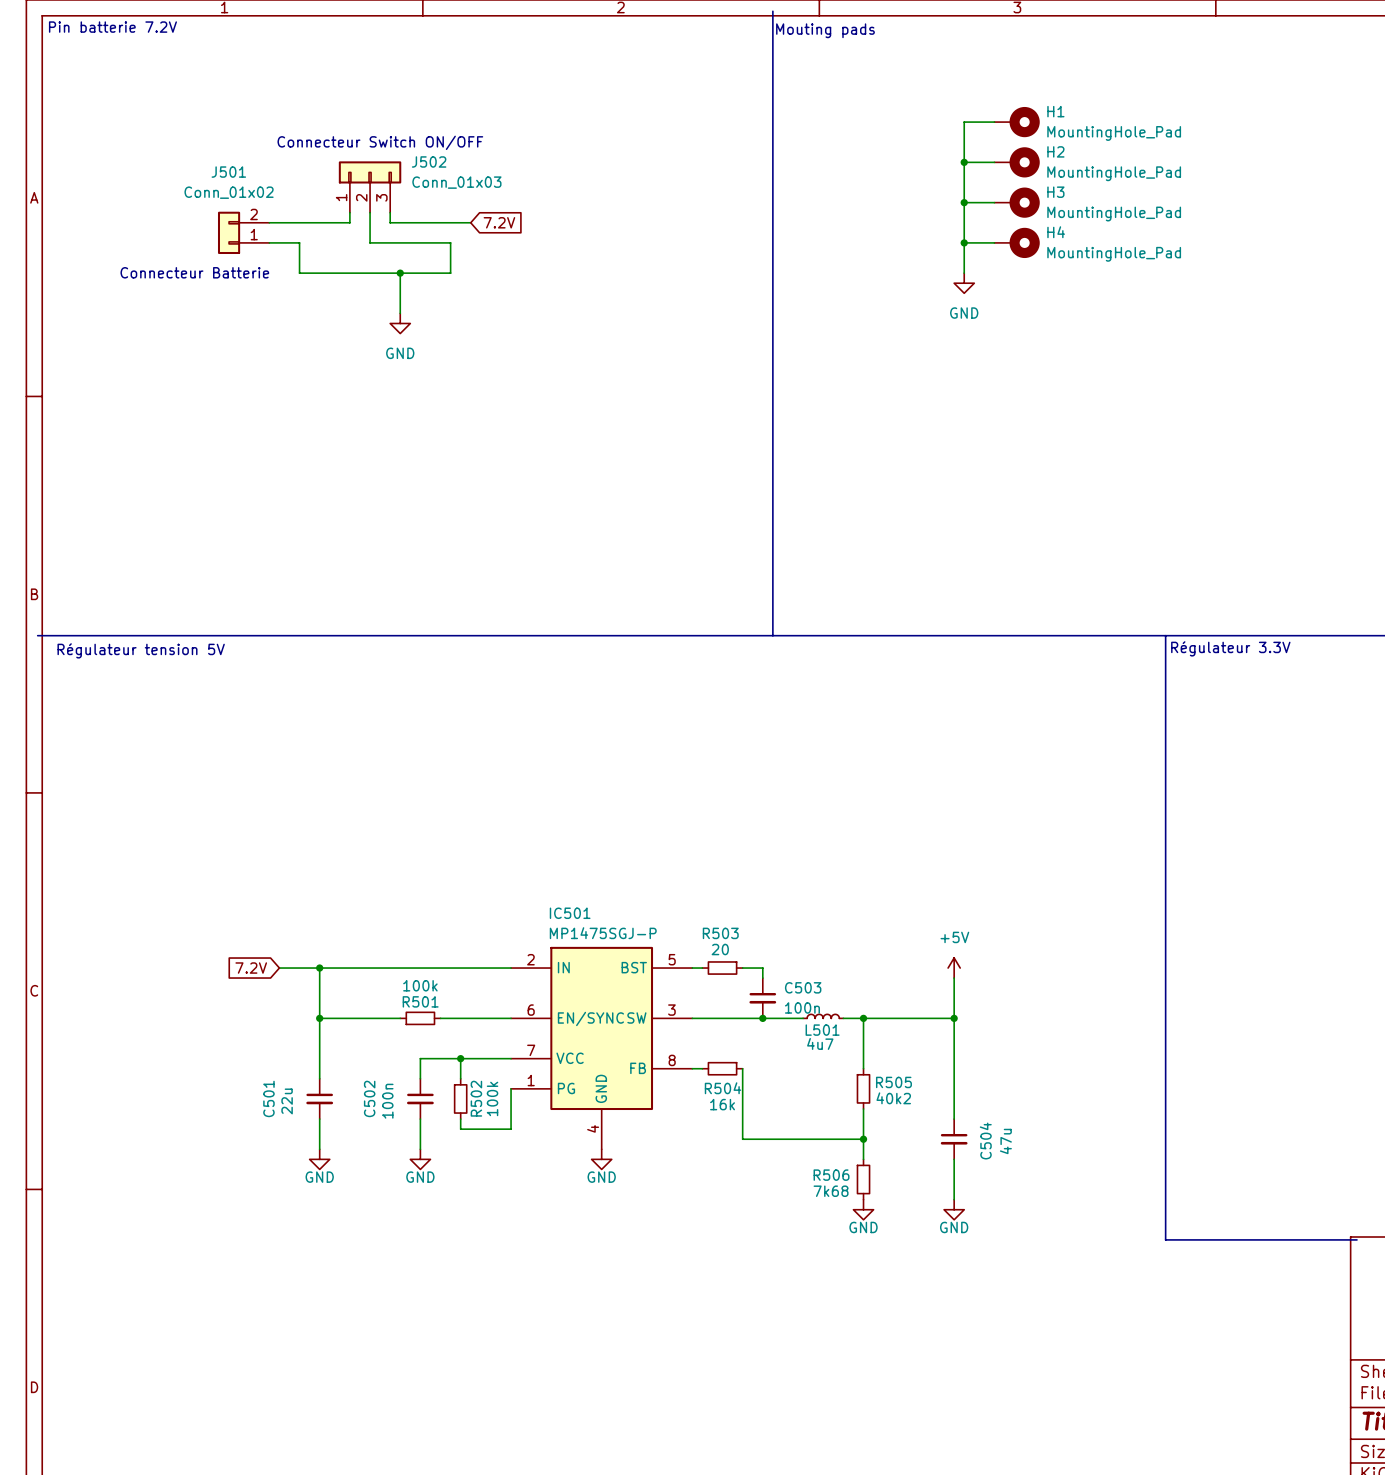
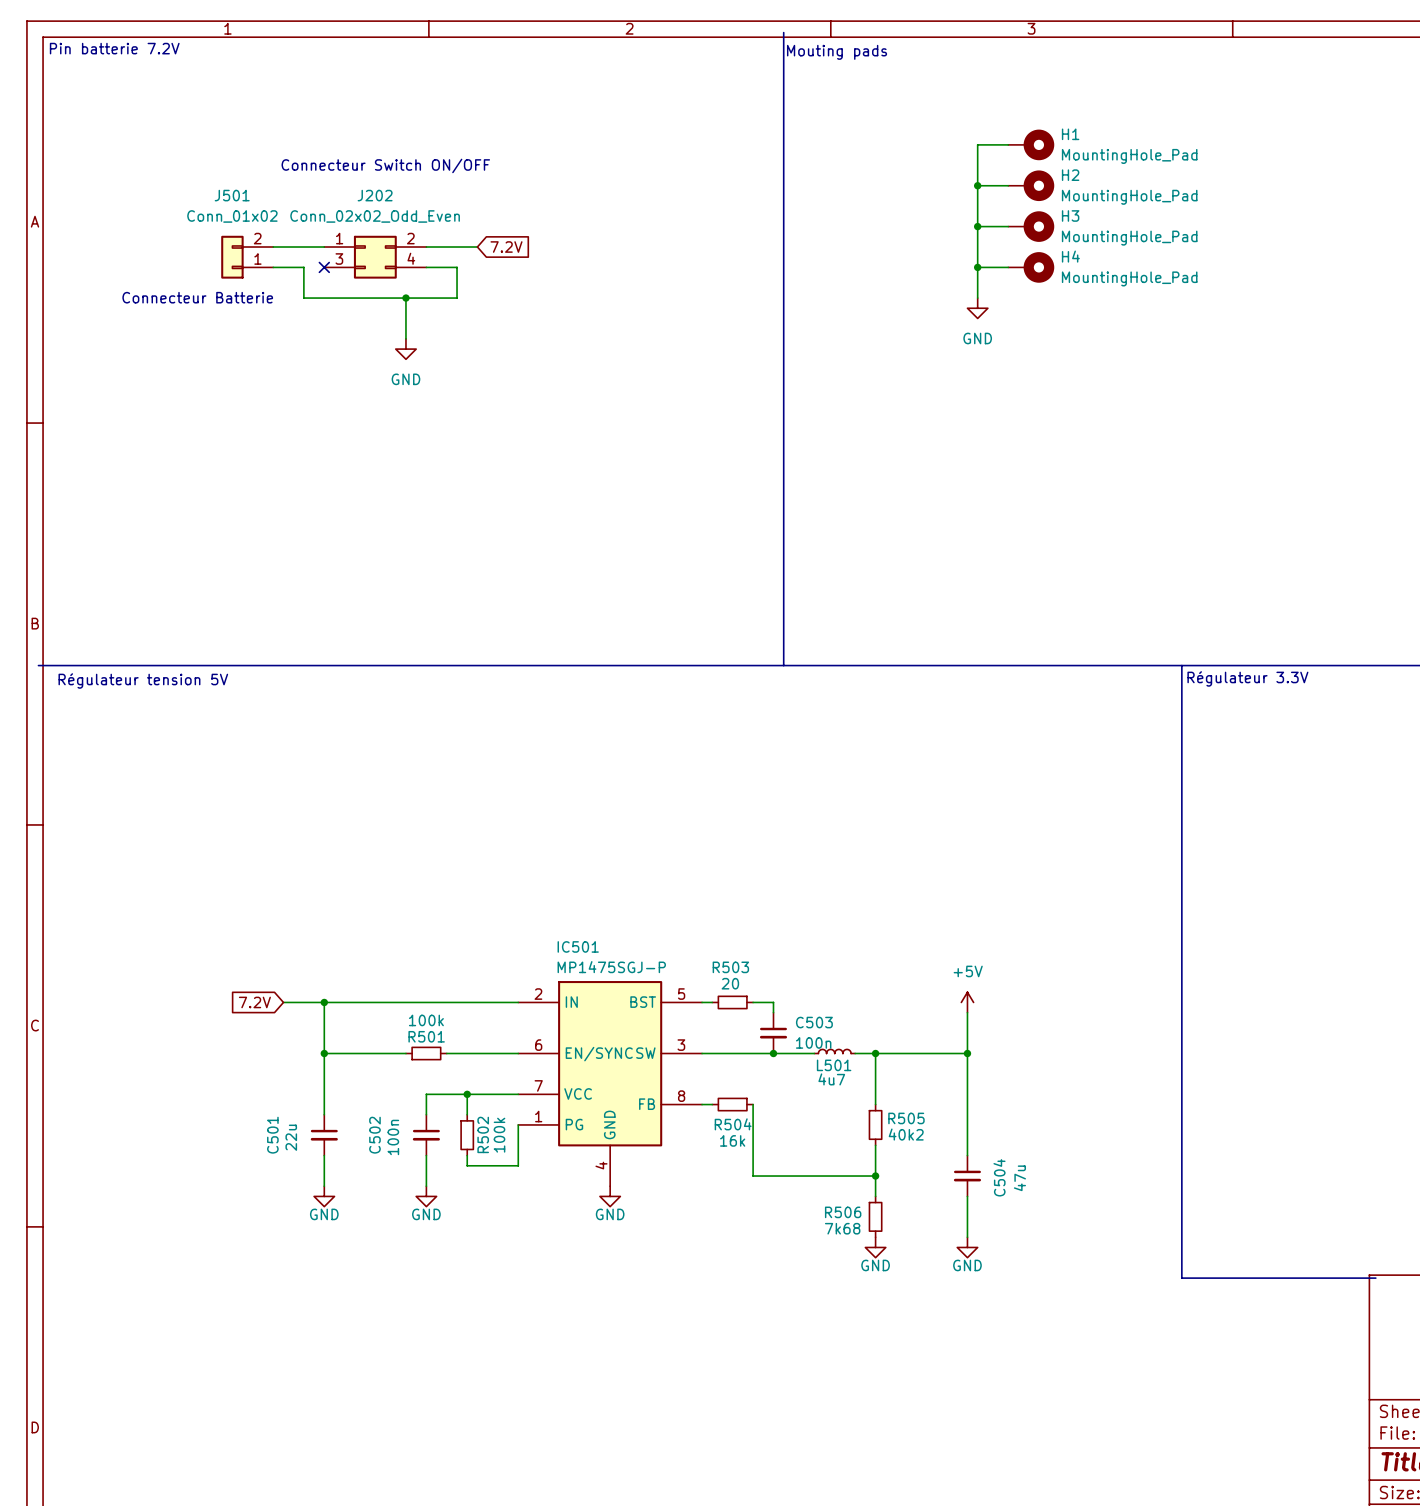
J502: Conn_01x03 (370, 187) -> none
J202: none -> Conn_02x02_Odd_Even (375, 257)
no-connect mark: none -> (324, 267)

